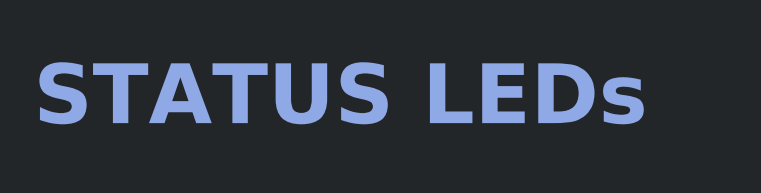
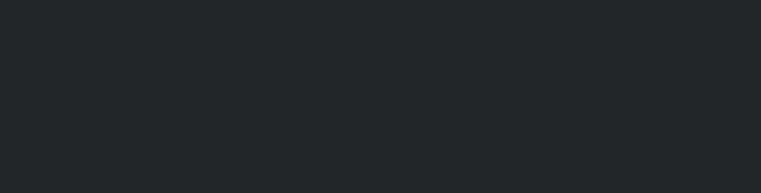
text: STATUS LEDs (341, 93) -> none

